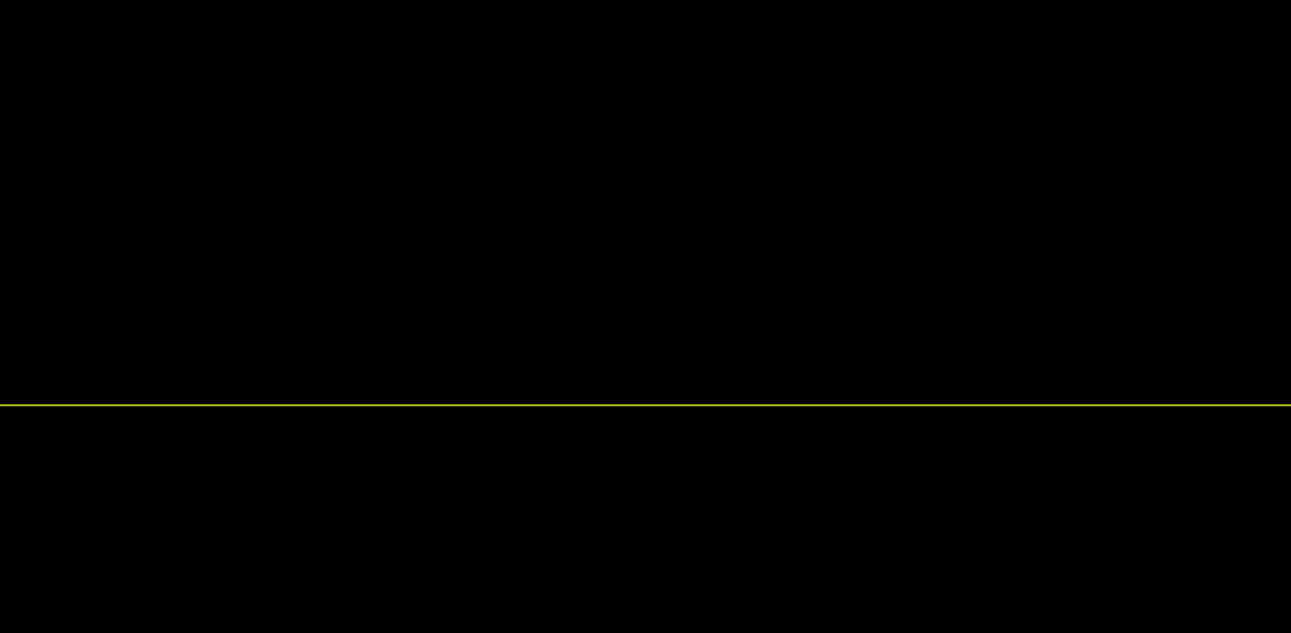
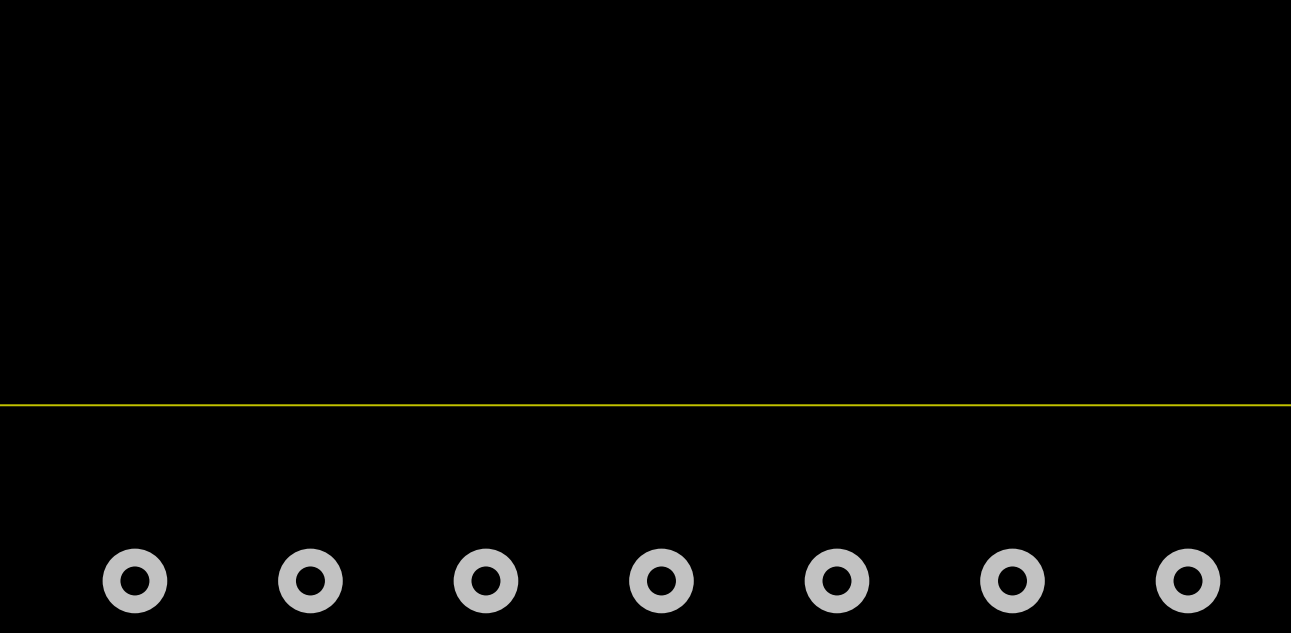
via: none -> (134, 580)
via: none -> (310, 580)
via: none -> (485, 580)
via: none -> (661, 580)
via: none -> (836, 580)
via: none -> (1012, 580)
via: none -> (1188, 580)

